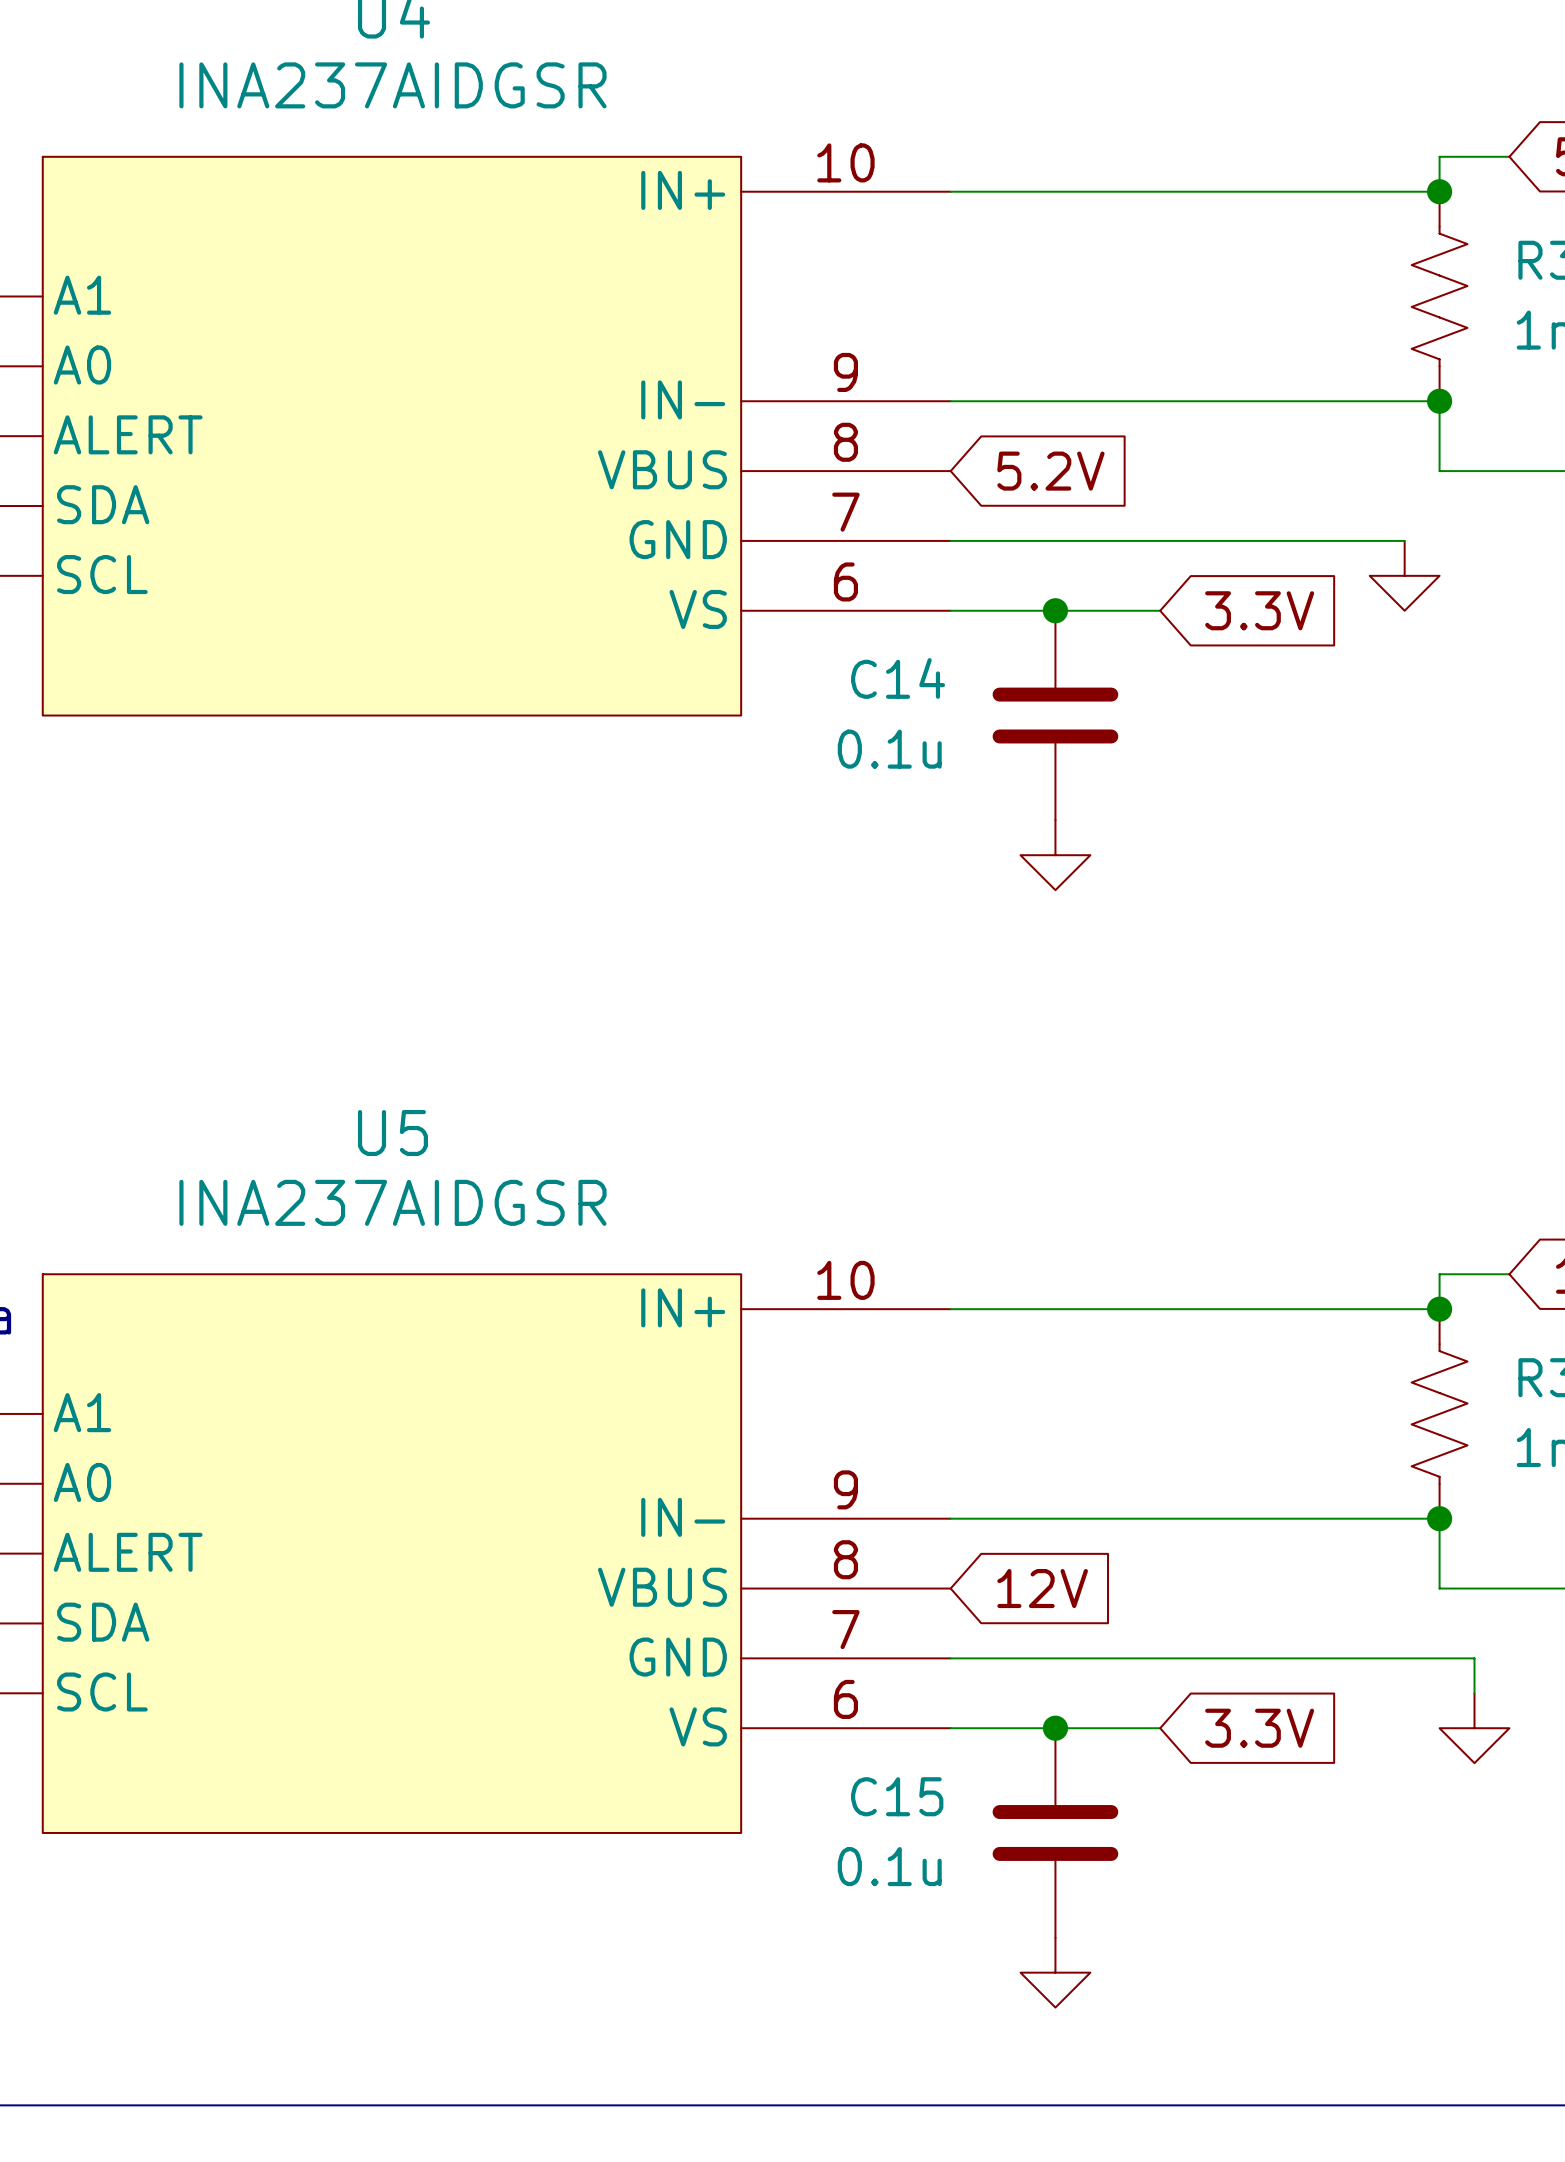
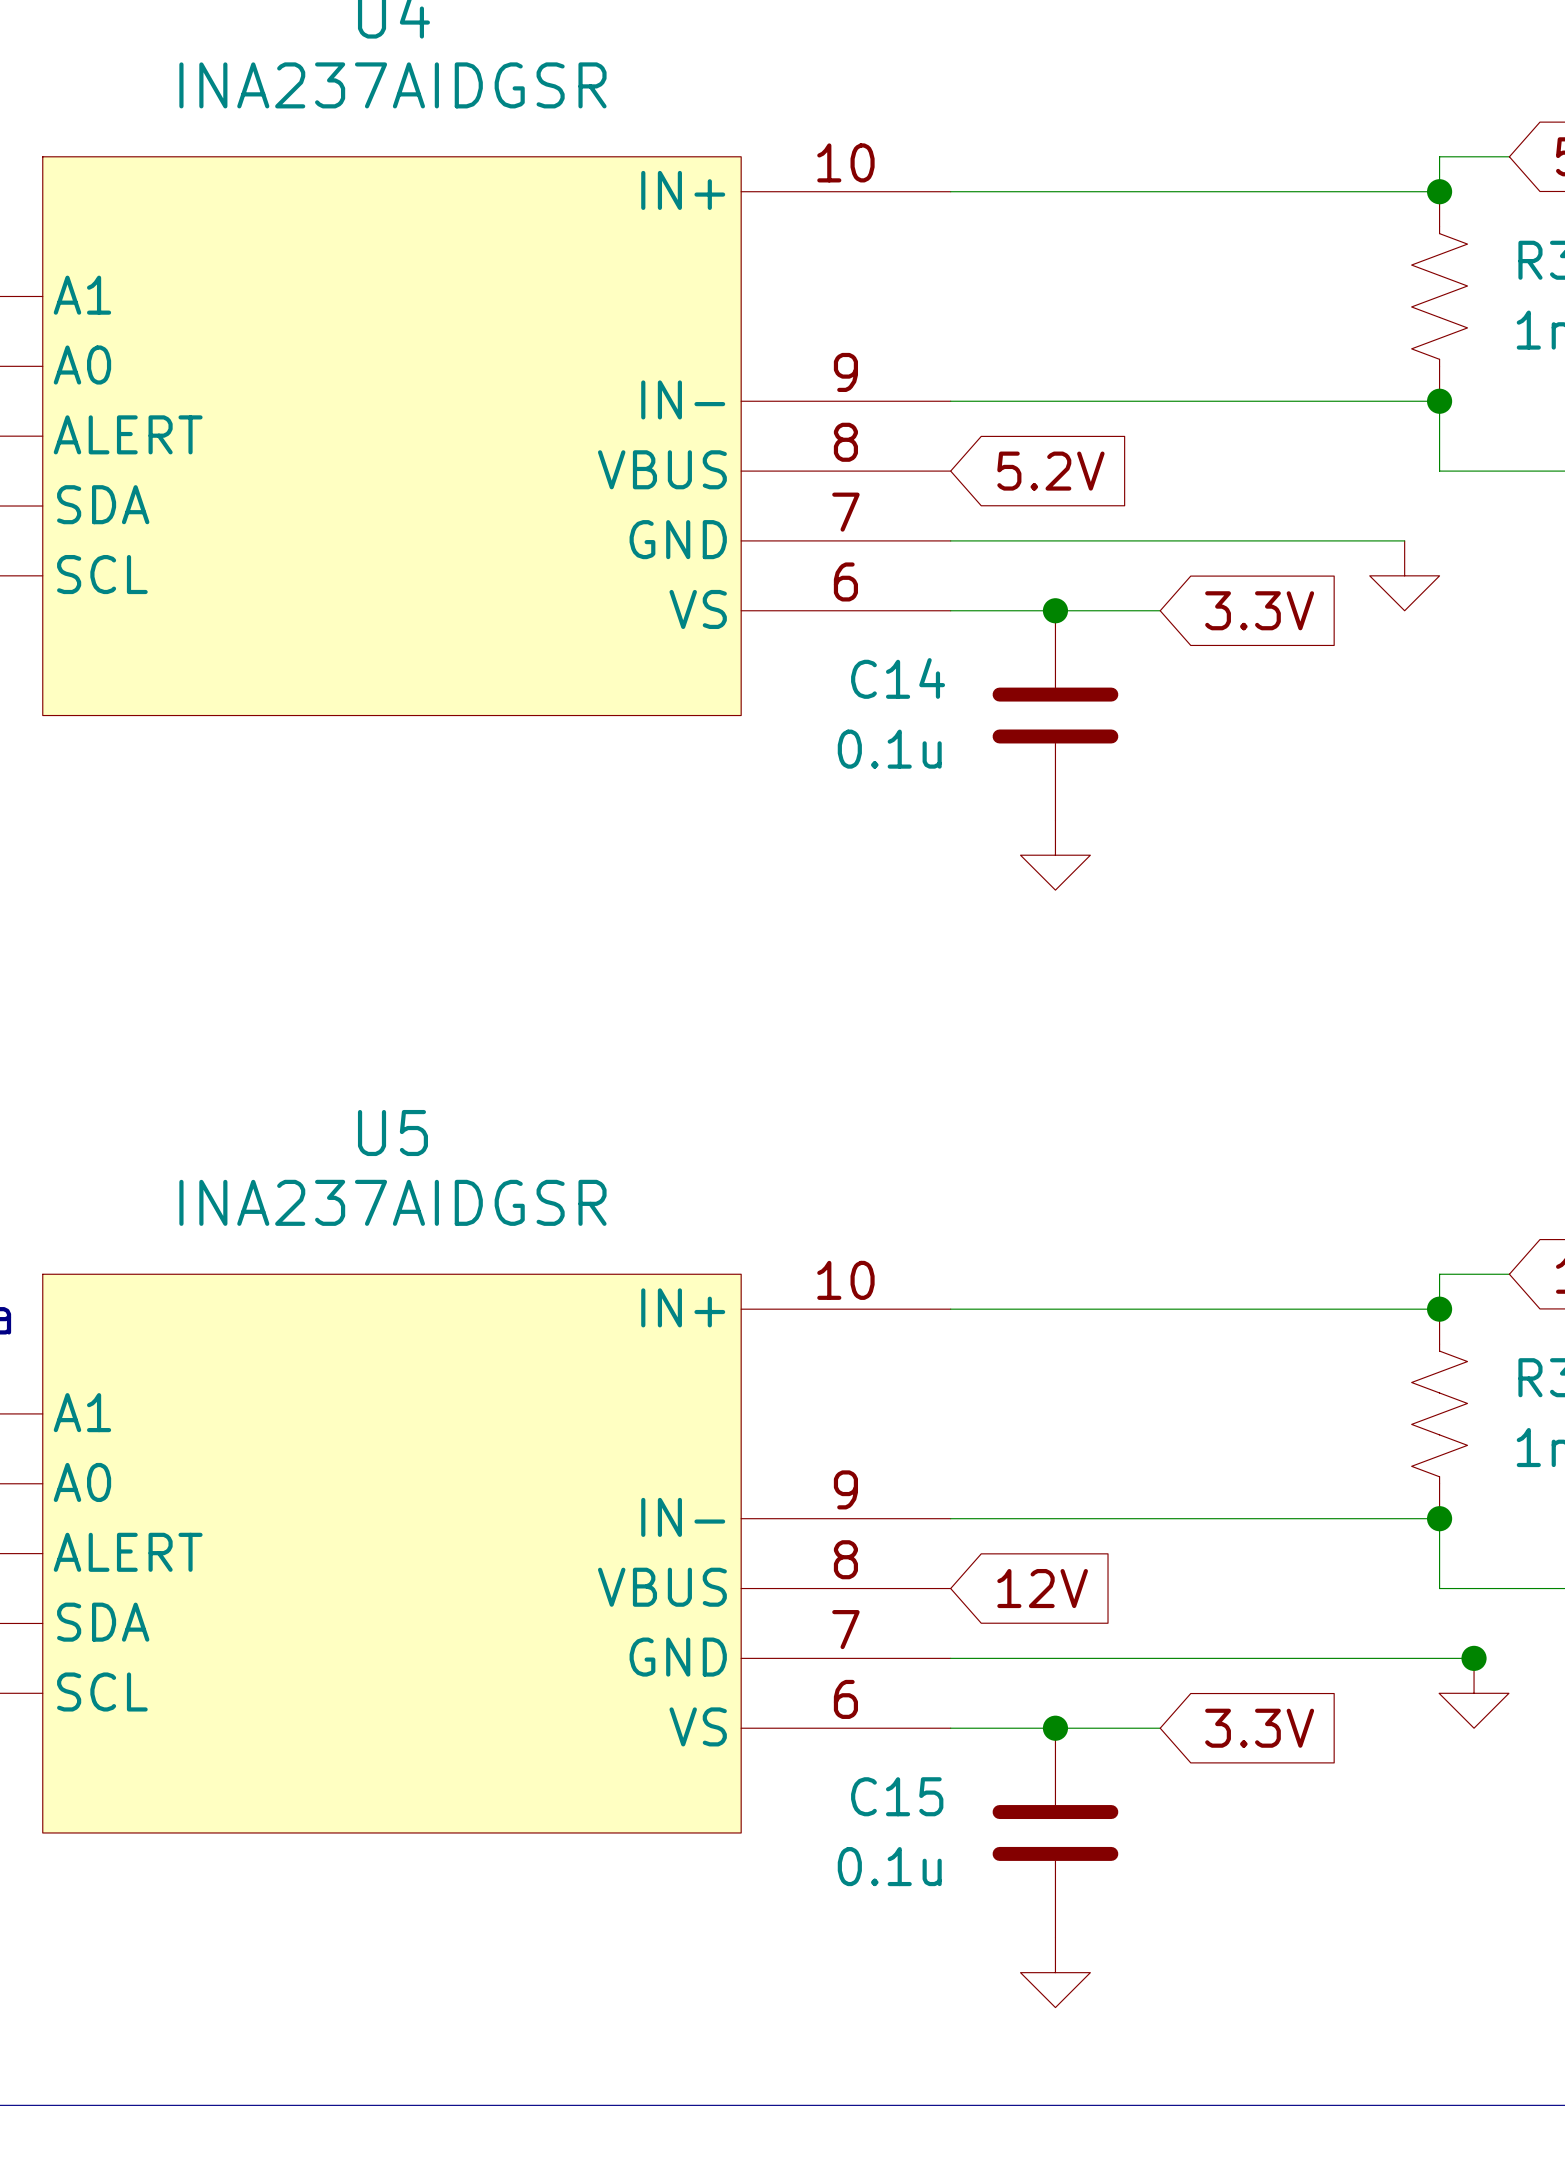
junction: none -> (1474, 1658)
power symbol position: (1474, 1728) -> (1474, 1693)

